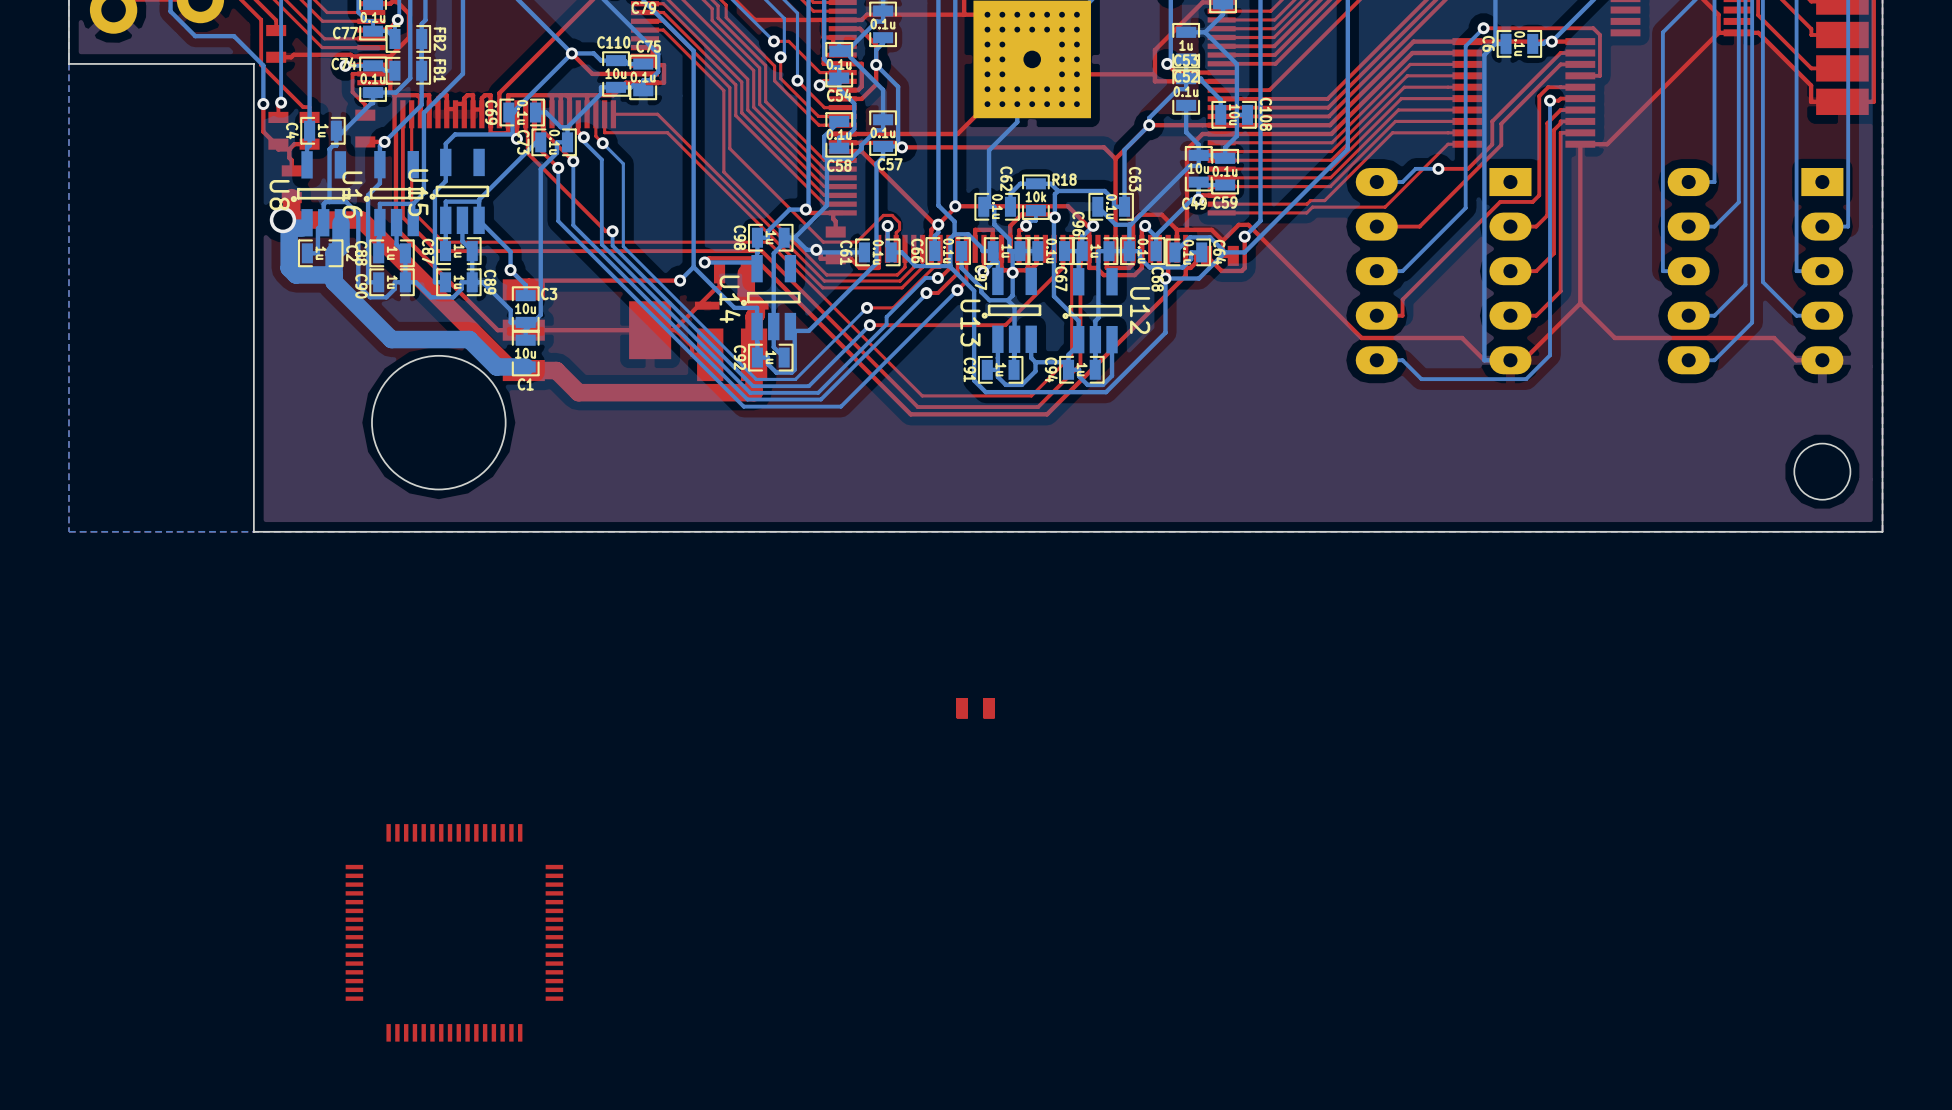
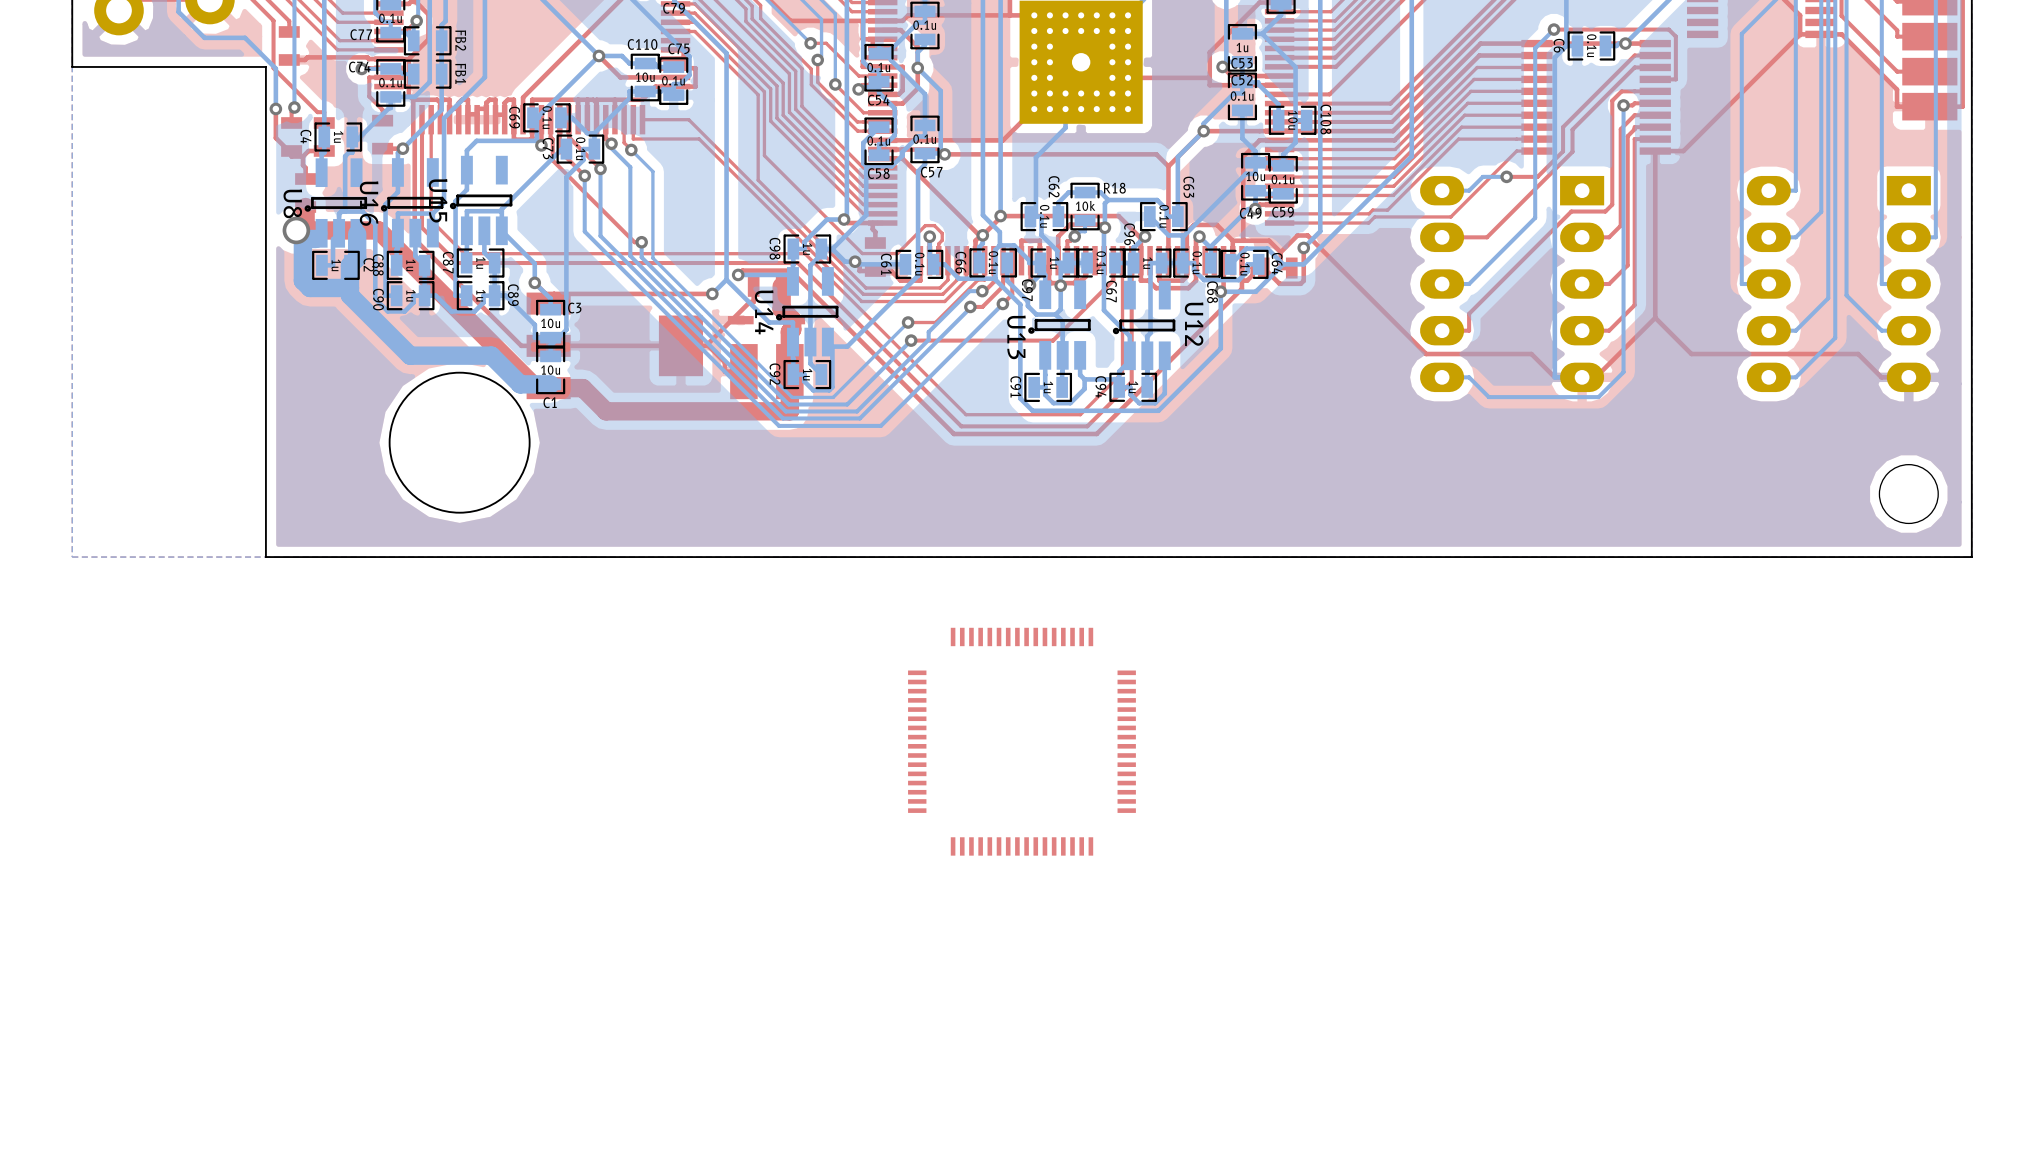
part footprint: [956, 698, 995, 719] -> [908, 627, 1136, 856]
part: (454, 932) -> none

